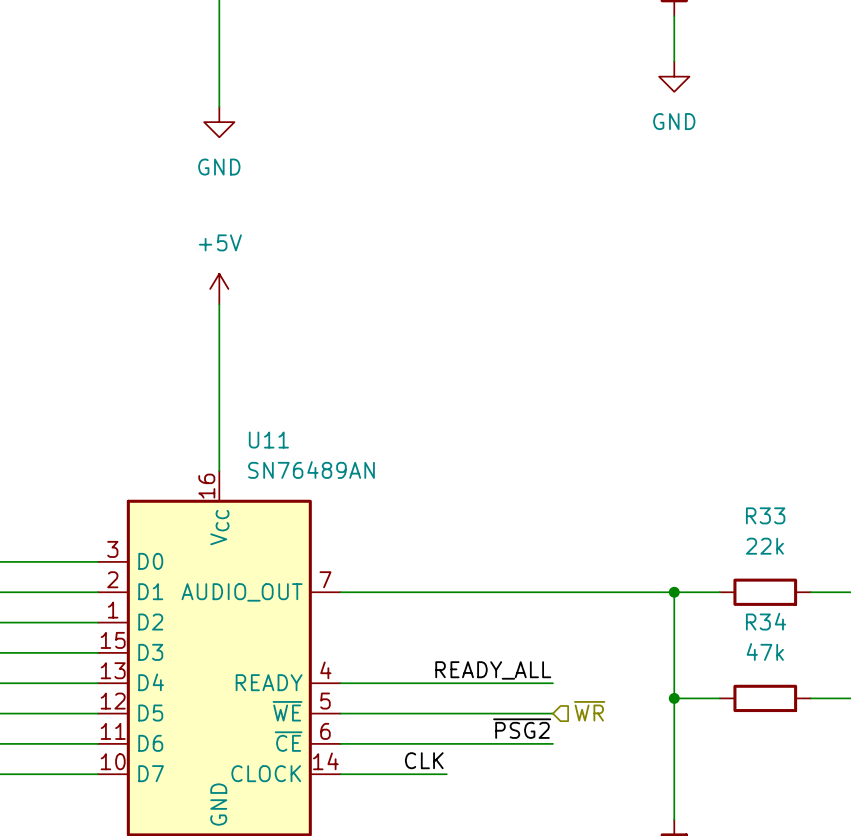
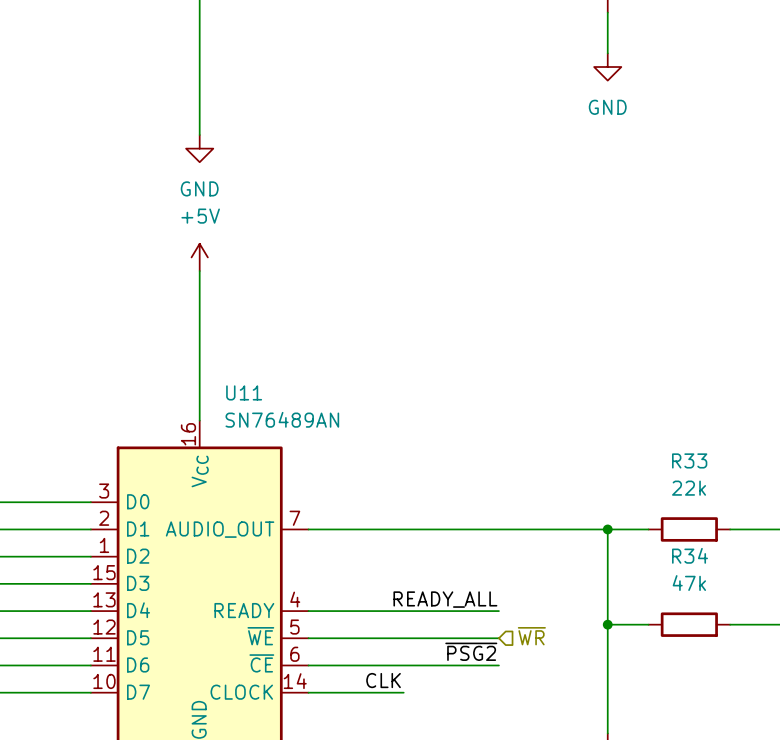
wire: none -> (199, 94) (199, 135)
power symbol position: GND (219, 122) -> GND (199, 148)

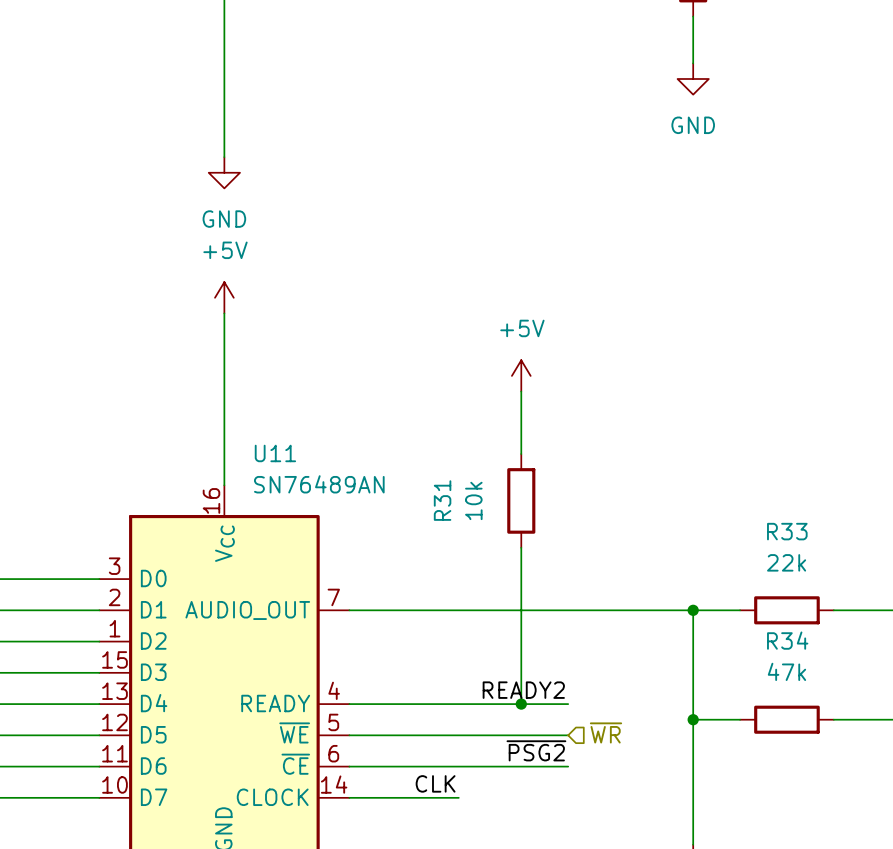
power symbol: none -> +5V (521, 375)
wire: none -> (521, 391) (521, 454)
R31: none -> 10k (521, 500)
wire: none -> (521, 547) (521, 704)
label: READY_ALL (445, 599) -> READY2 (523, 690)
junction: none -> (521, 704)

